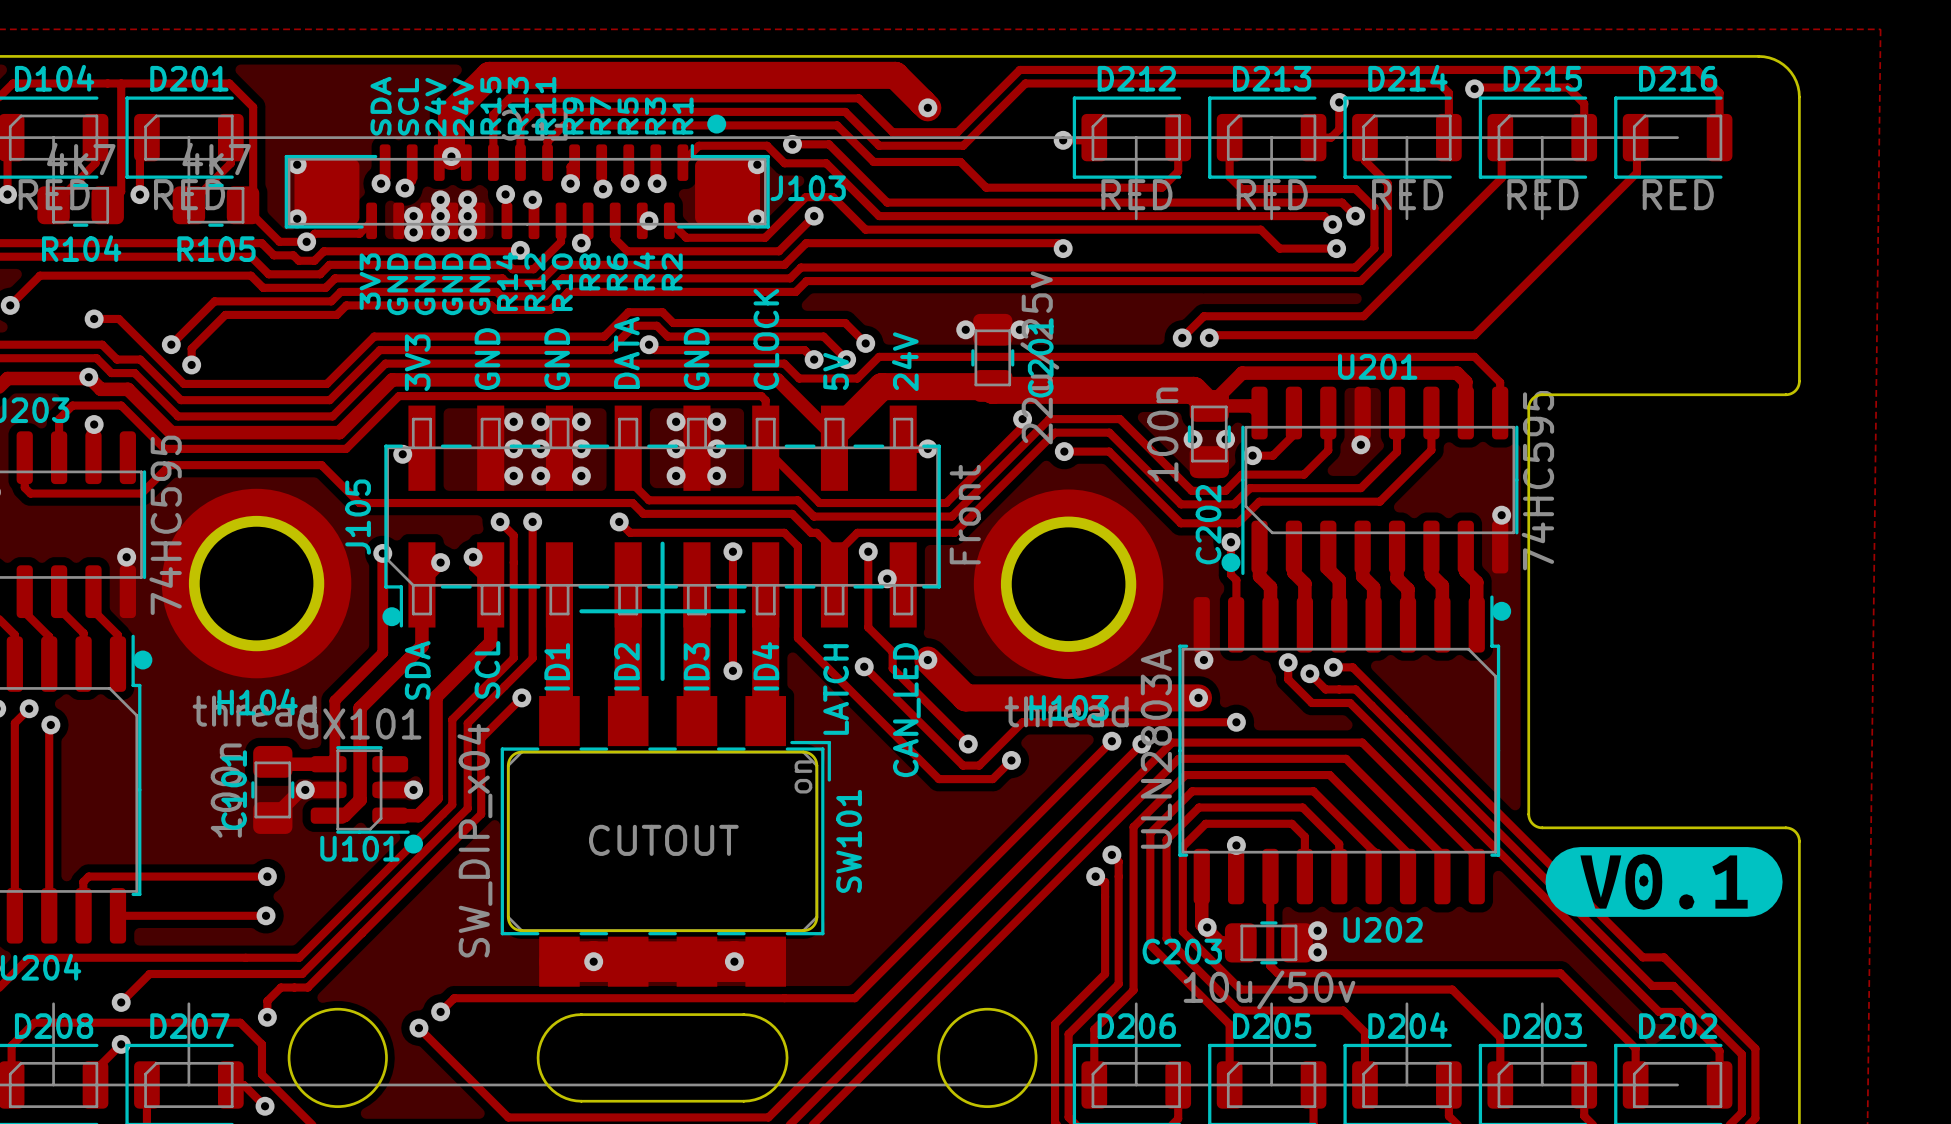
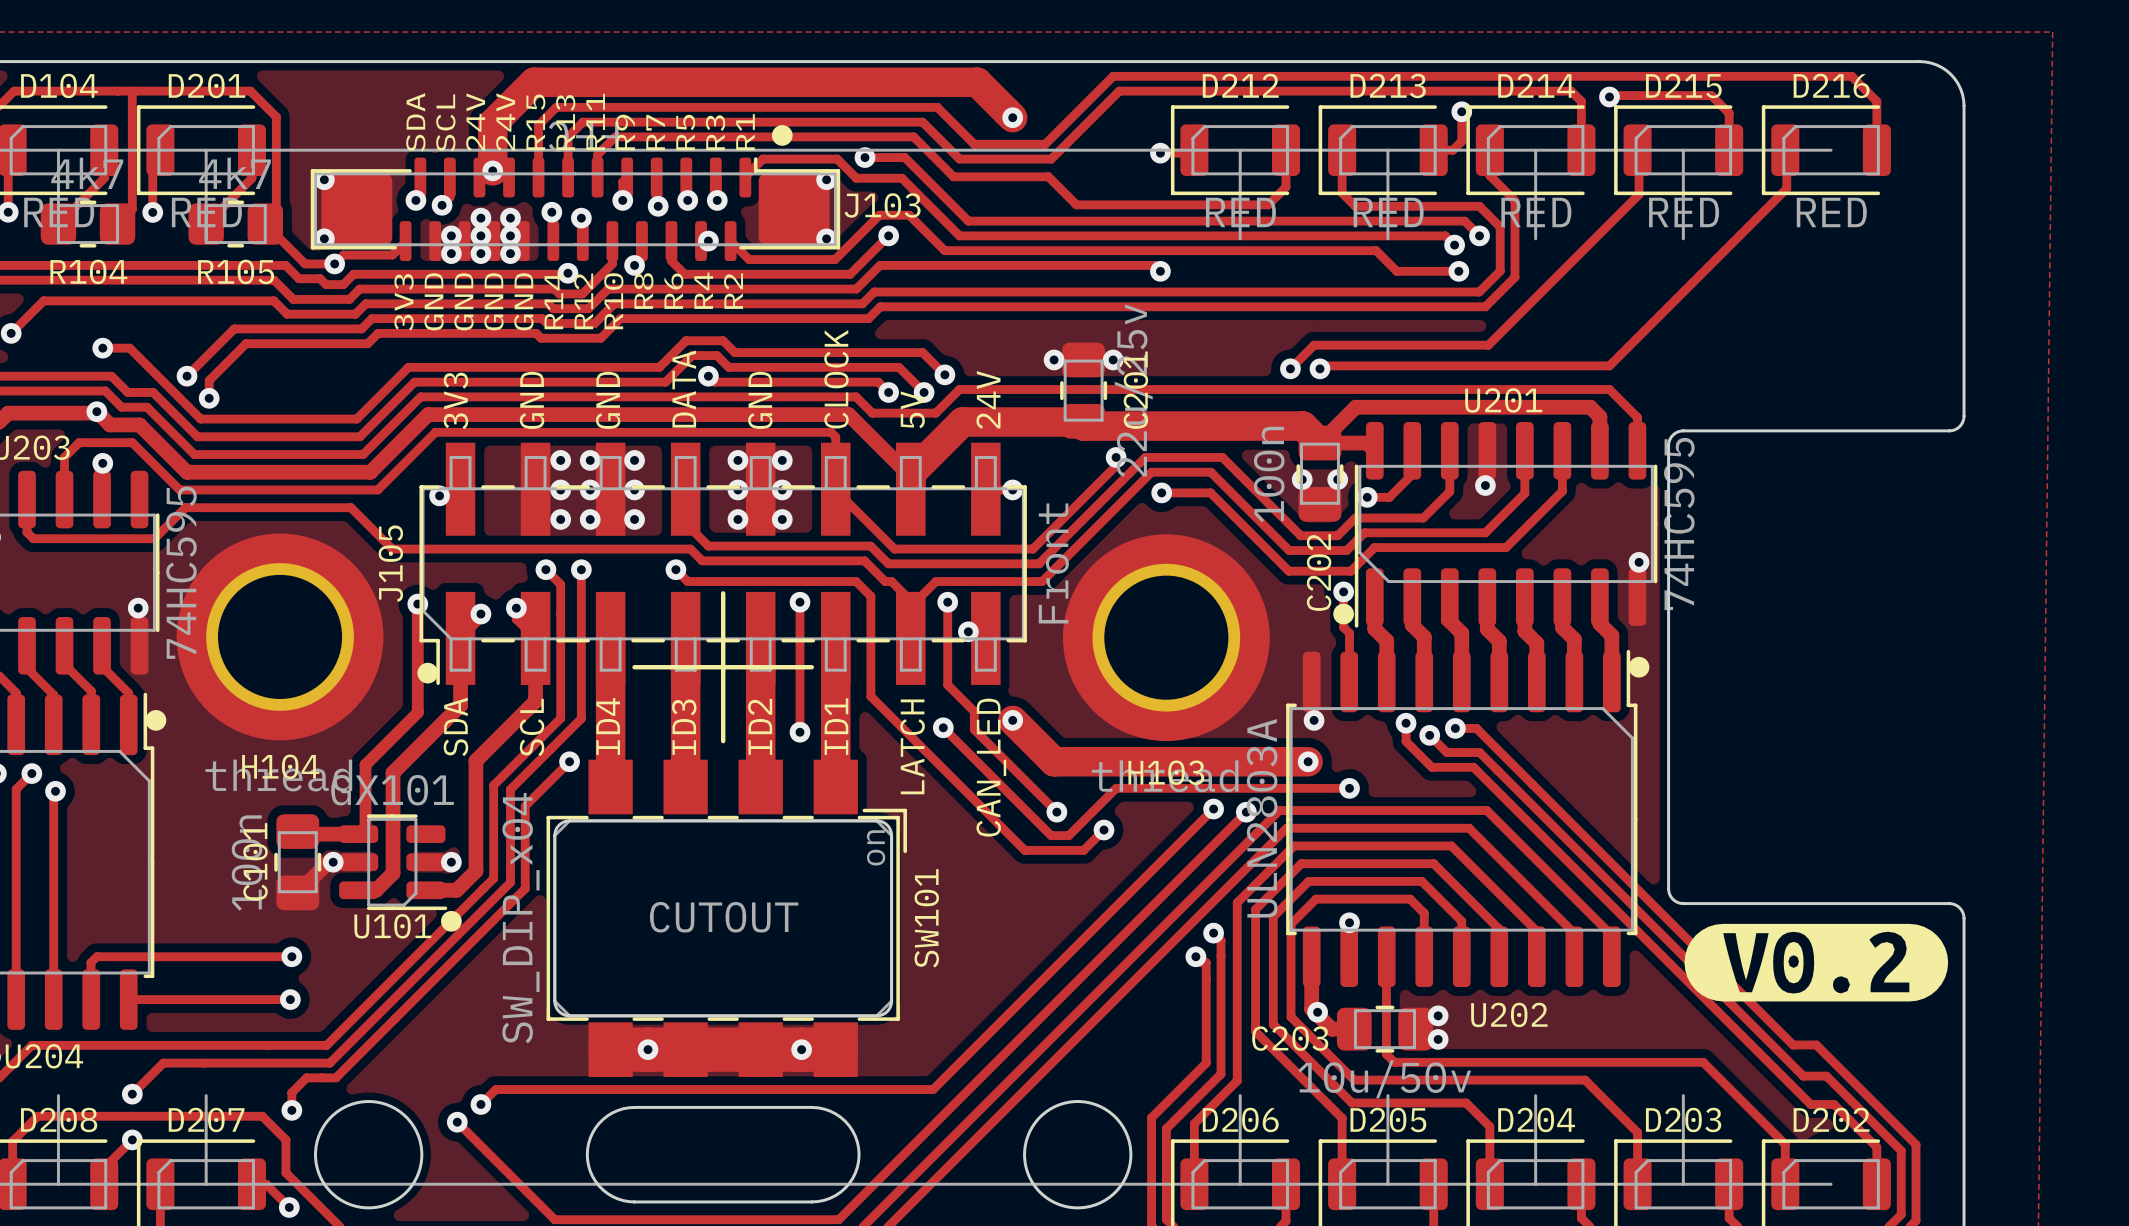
text: ID1 (557, 666) -> ID4 (608, 726)
text: ID2 (626, 666) -> ID3 (684, 727)
text: ID3 (696, 666) -> ID2 (760, 726)
text: ID4 (765, 666) -> ID1 (836, 726)
drawing shape: [1545, 847, 1783, 917] -> [1684, 923, 1949, 1002]

